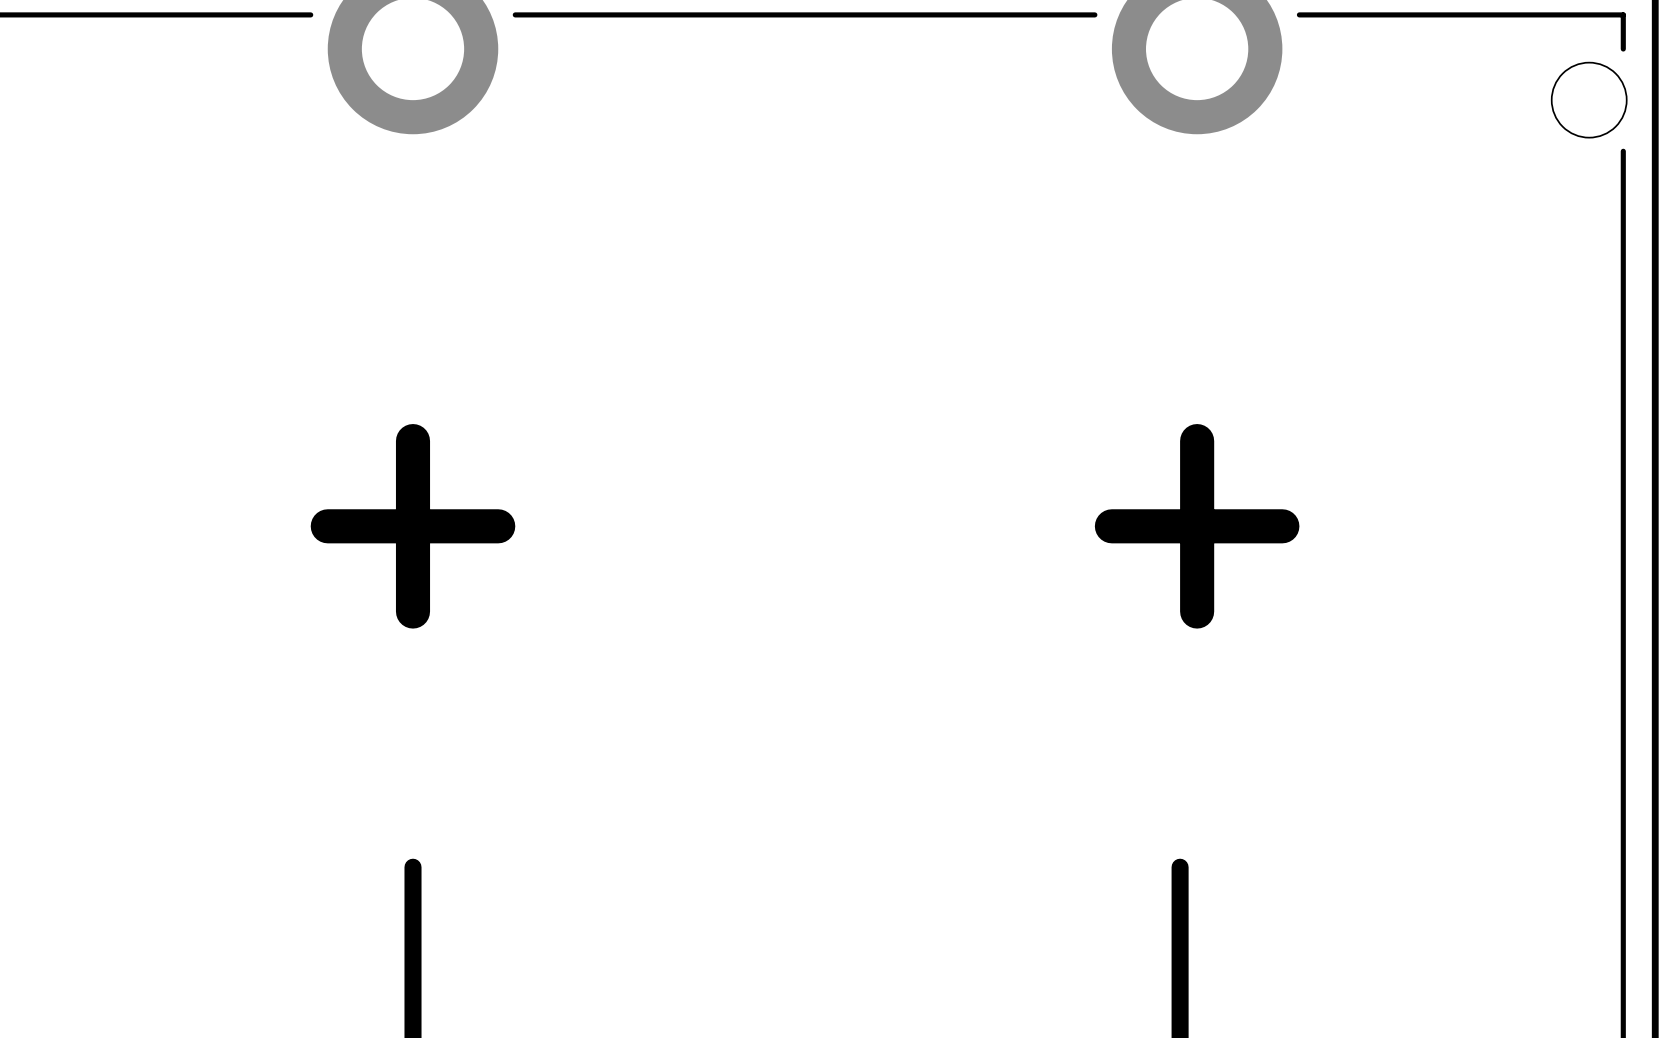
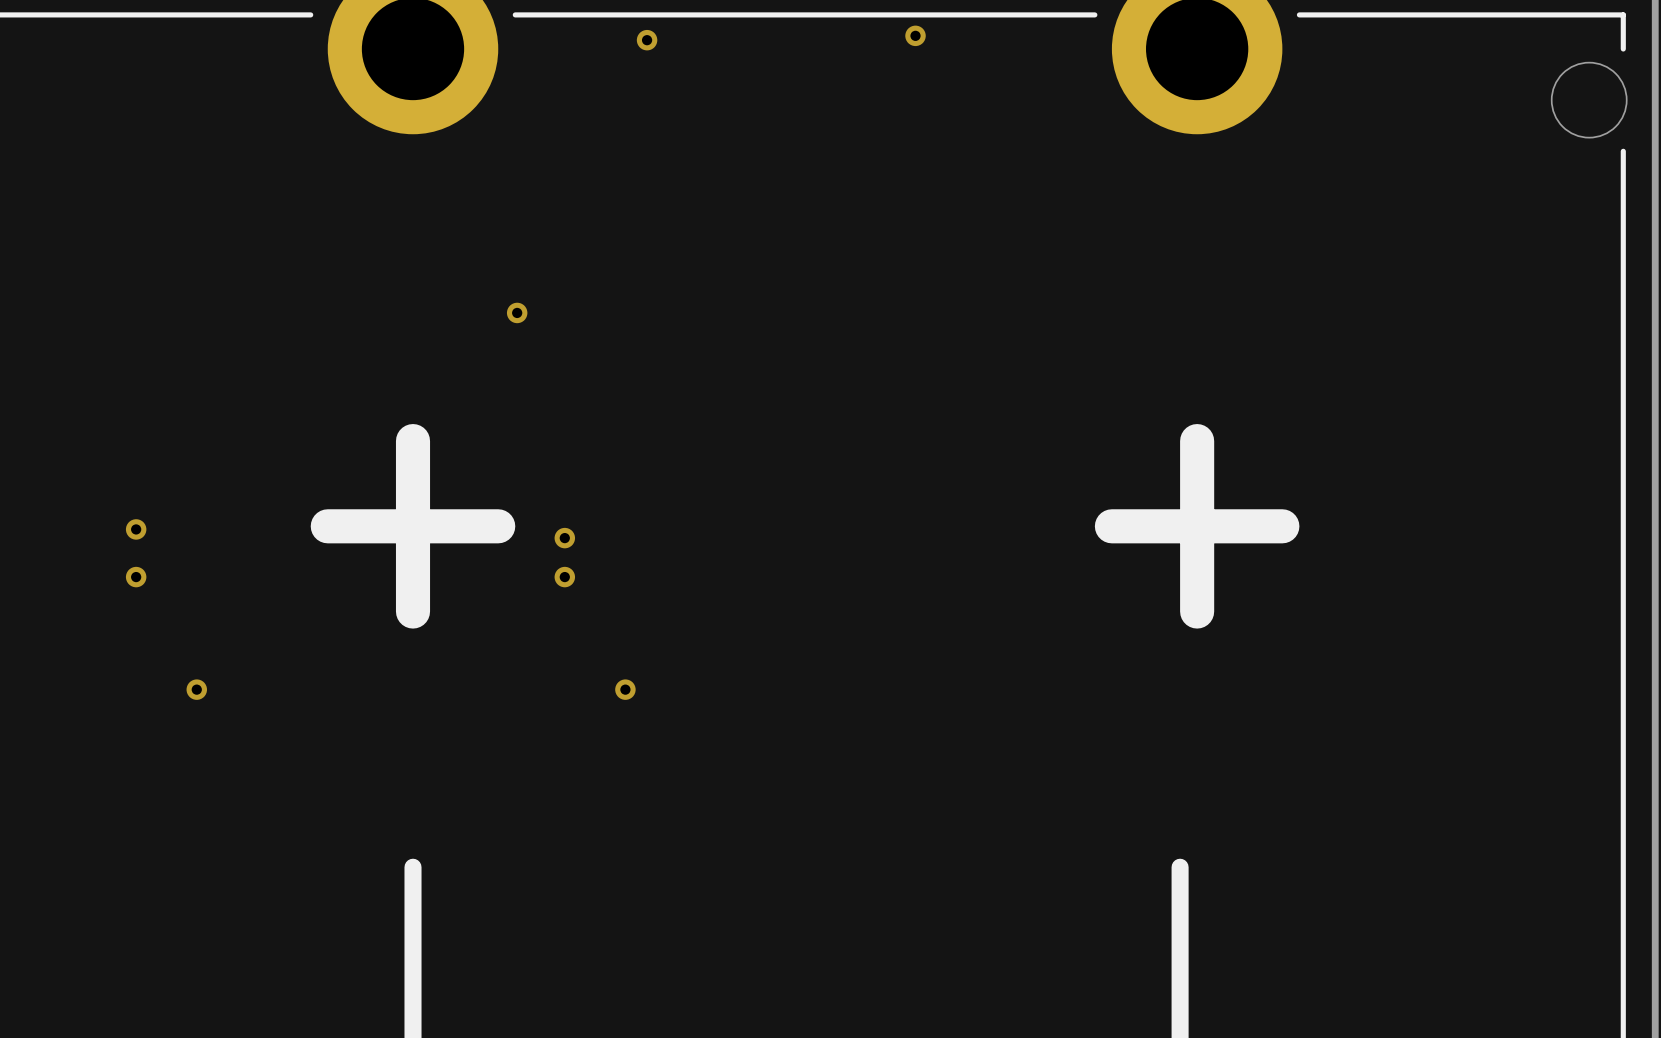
via: none -> (915, 35)
via: none -> (647, 40)
via: none -> (517, 312)
via: none -> (136, 529)
via: none -> (564, 538)
via: none -> (136, 577)
via: none -> (564, 577)
via: none -> (196, 689)
via: none -> (625, 689)

